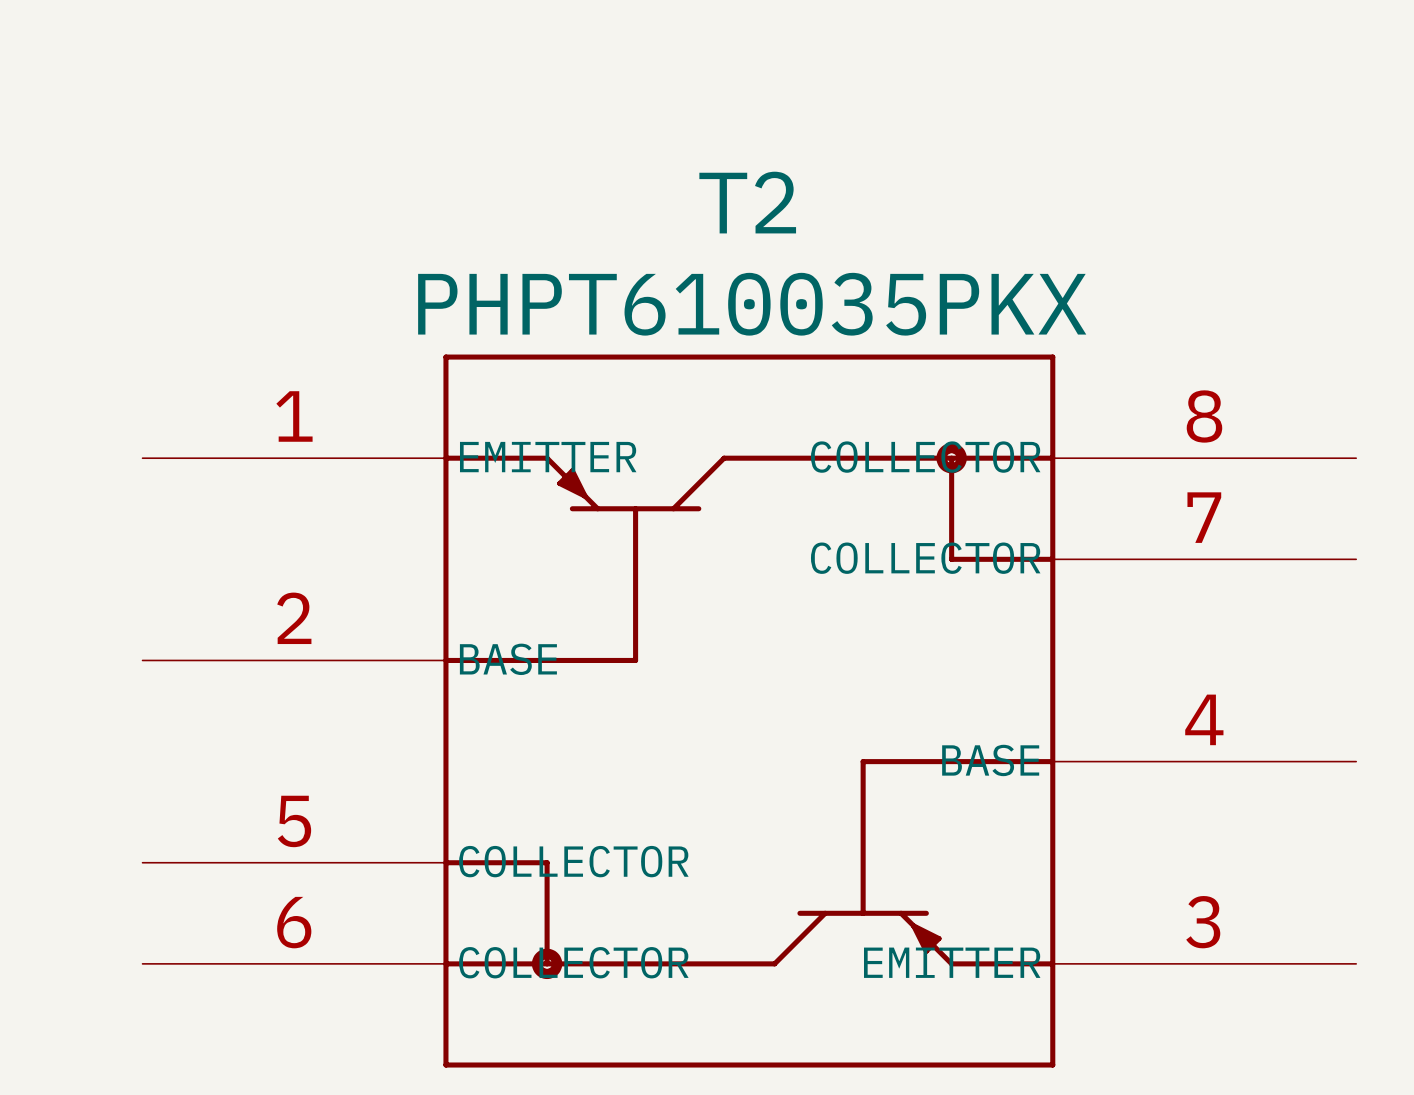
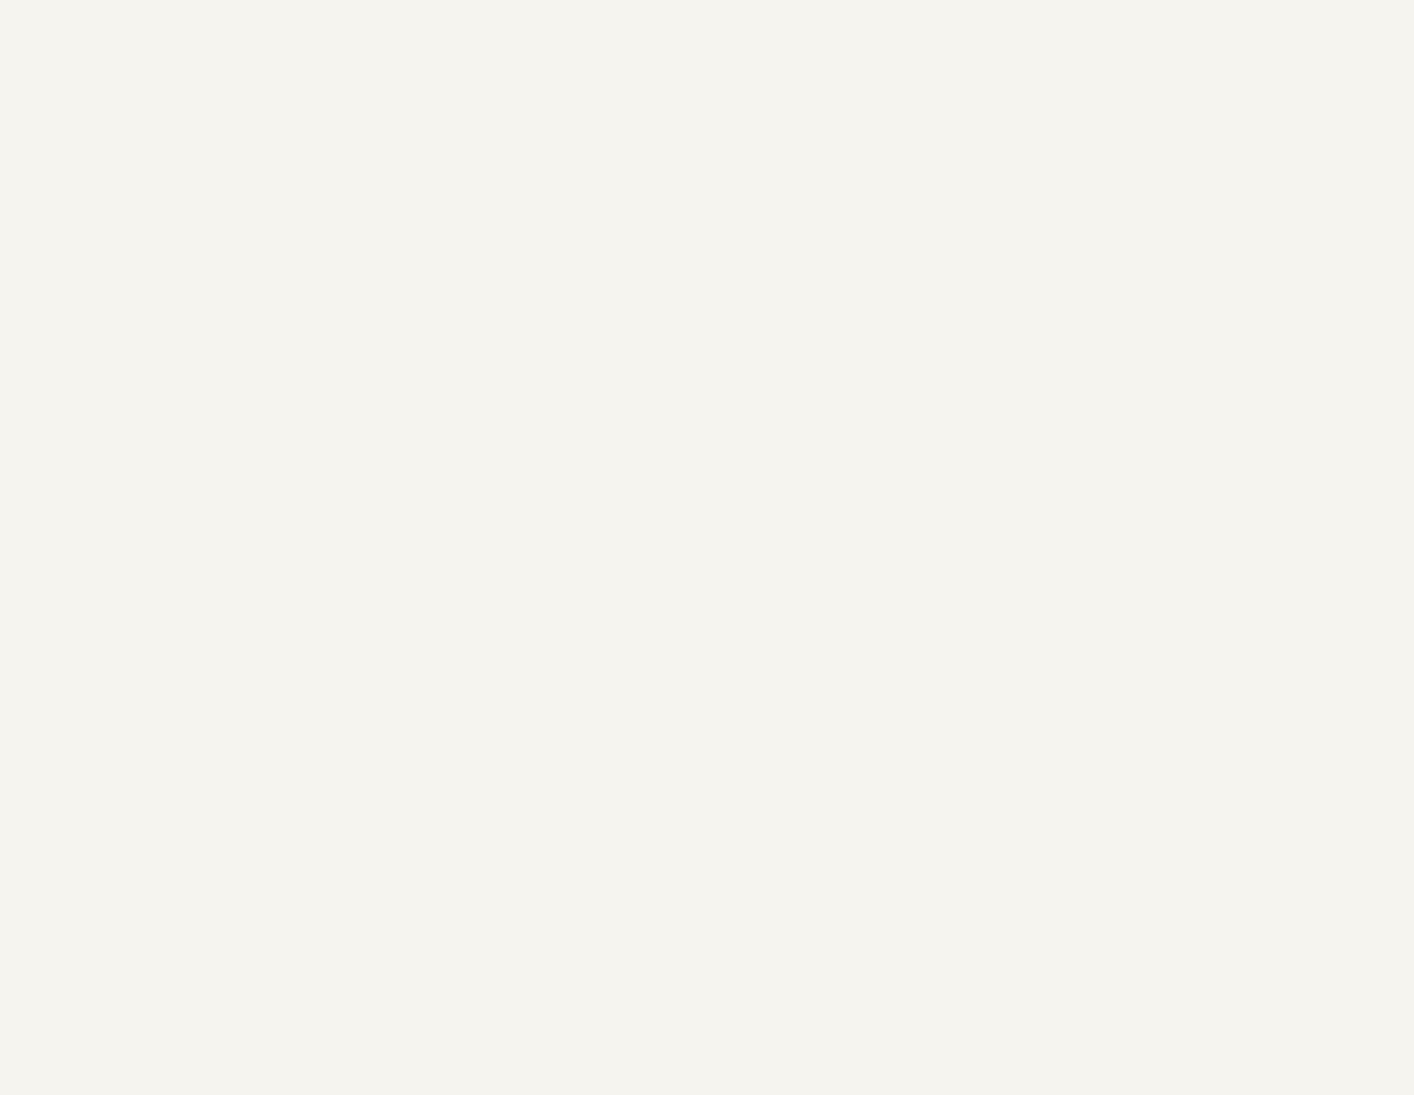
T2: PHPT610035PKX (749, 711) -> none

